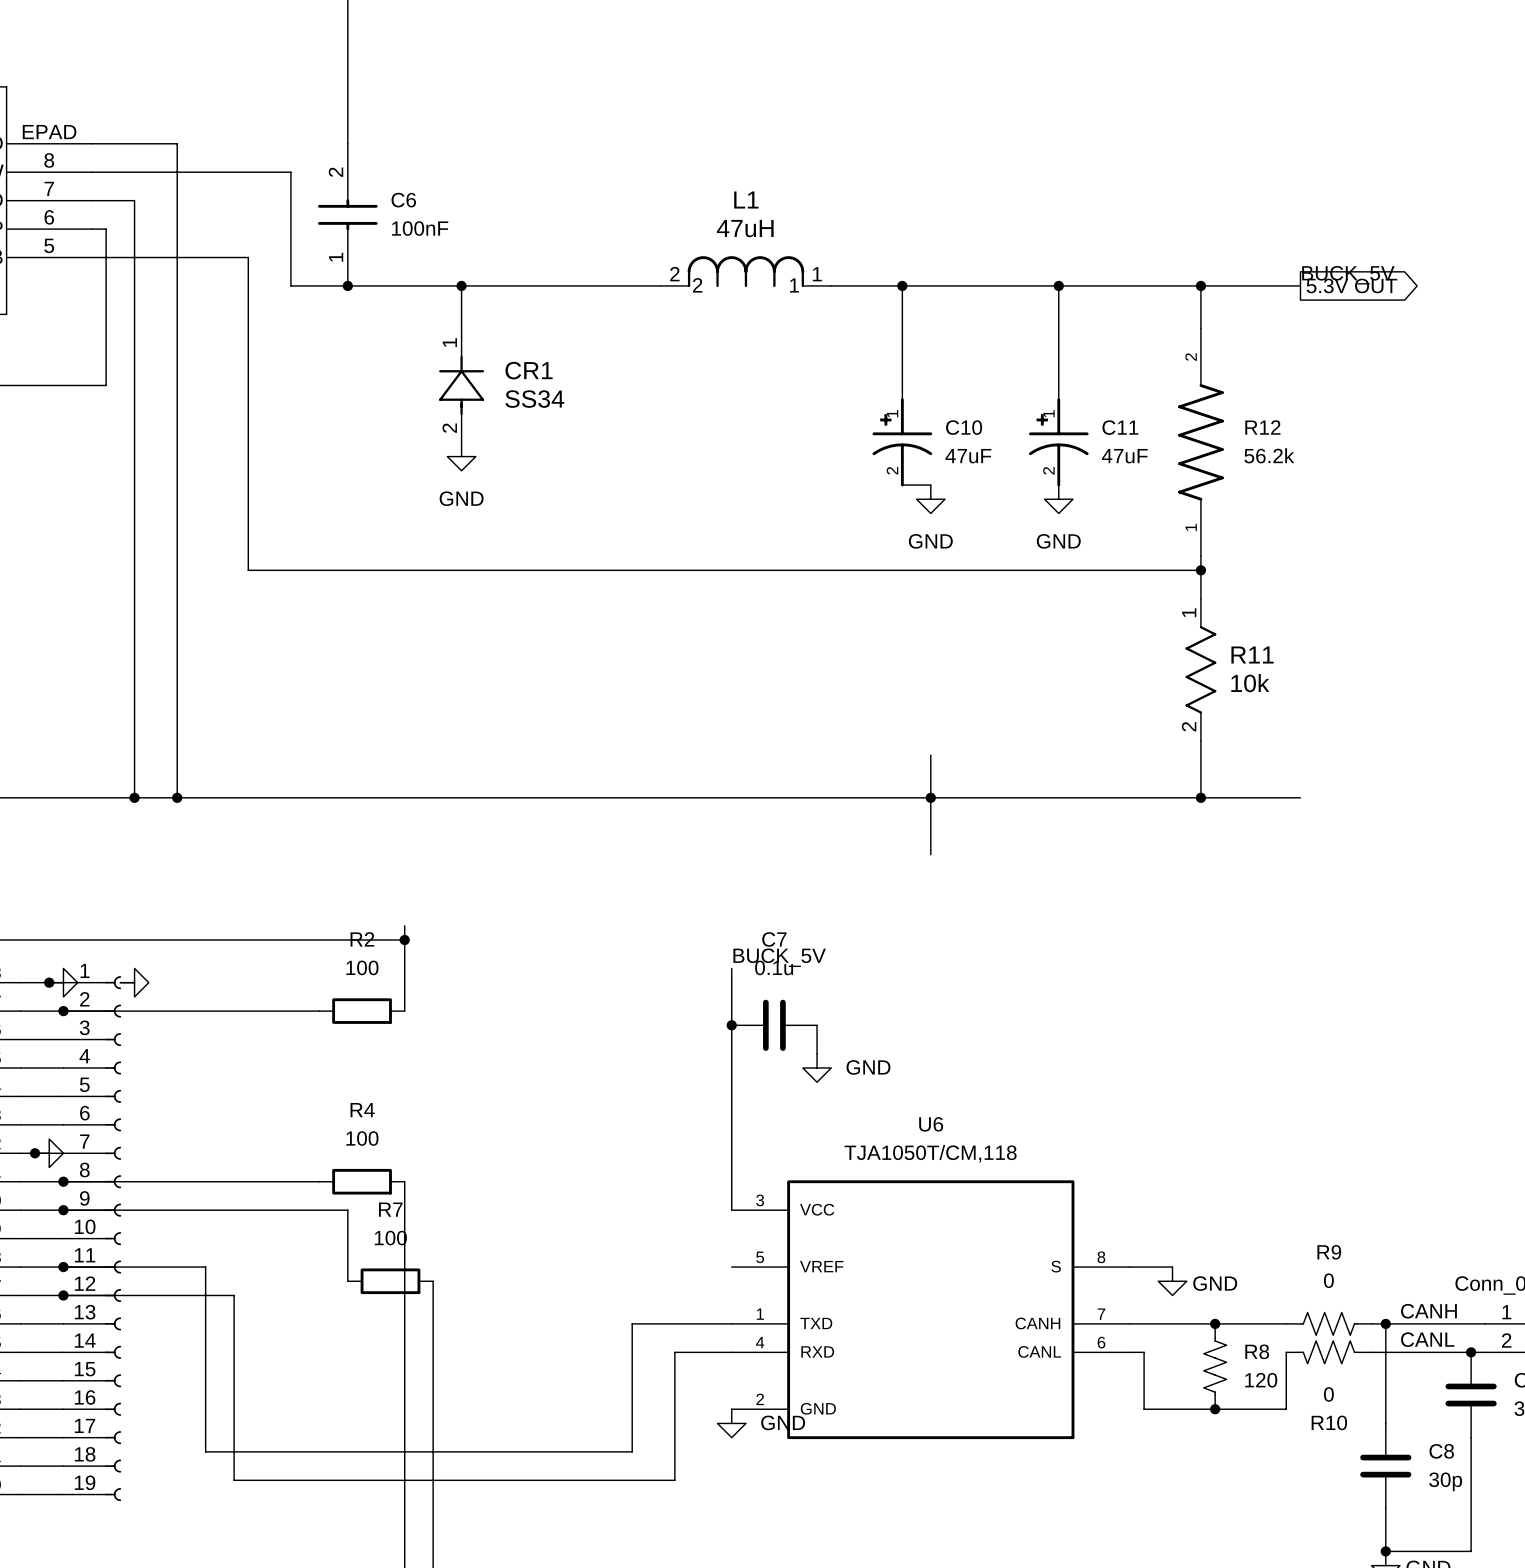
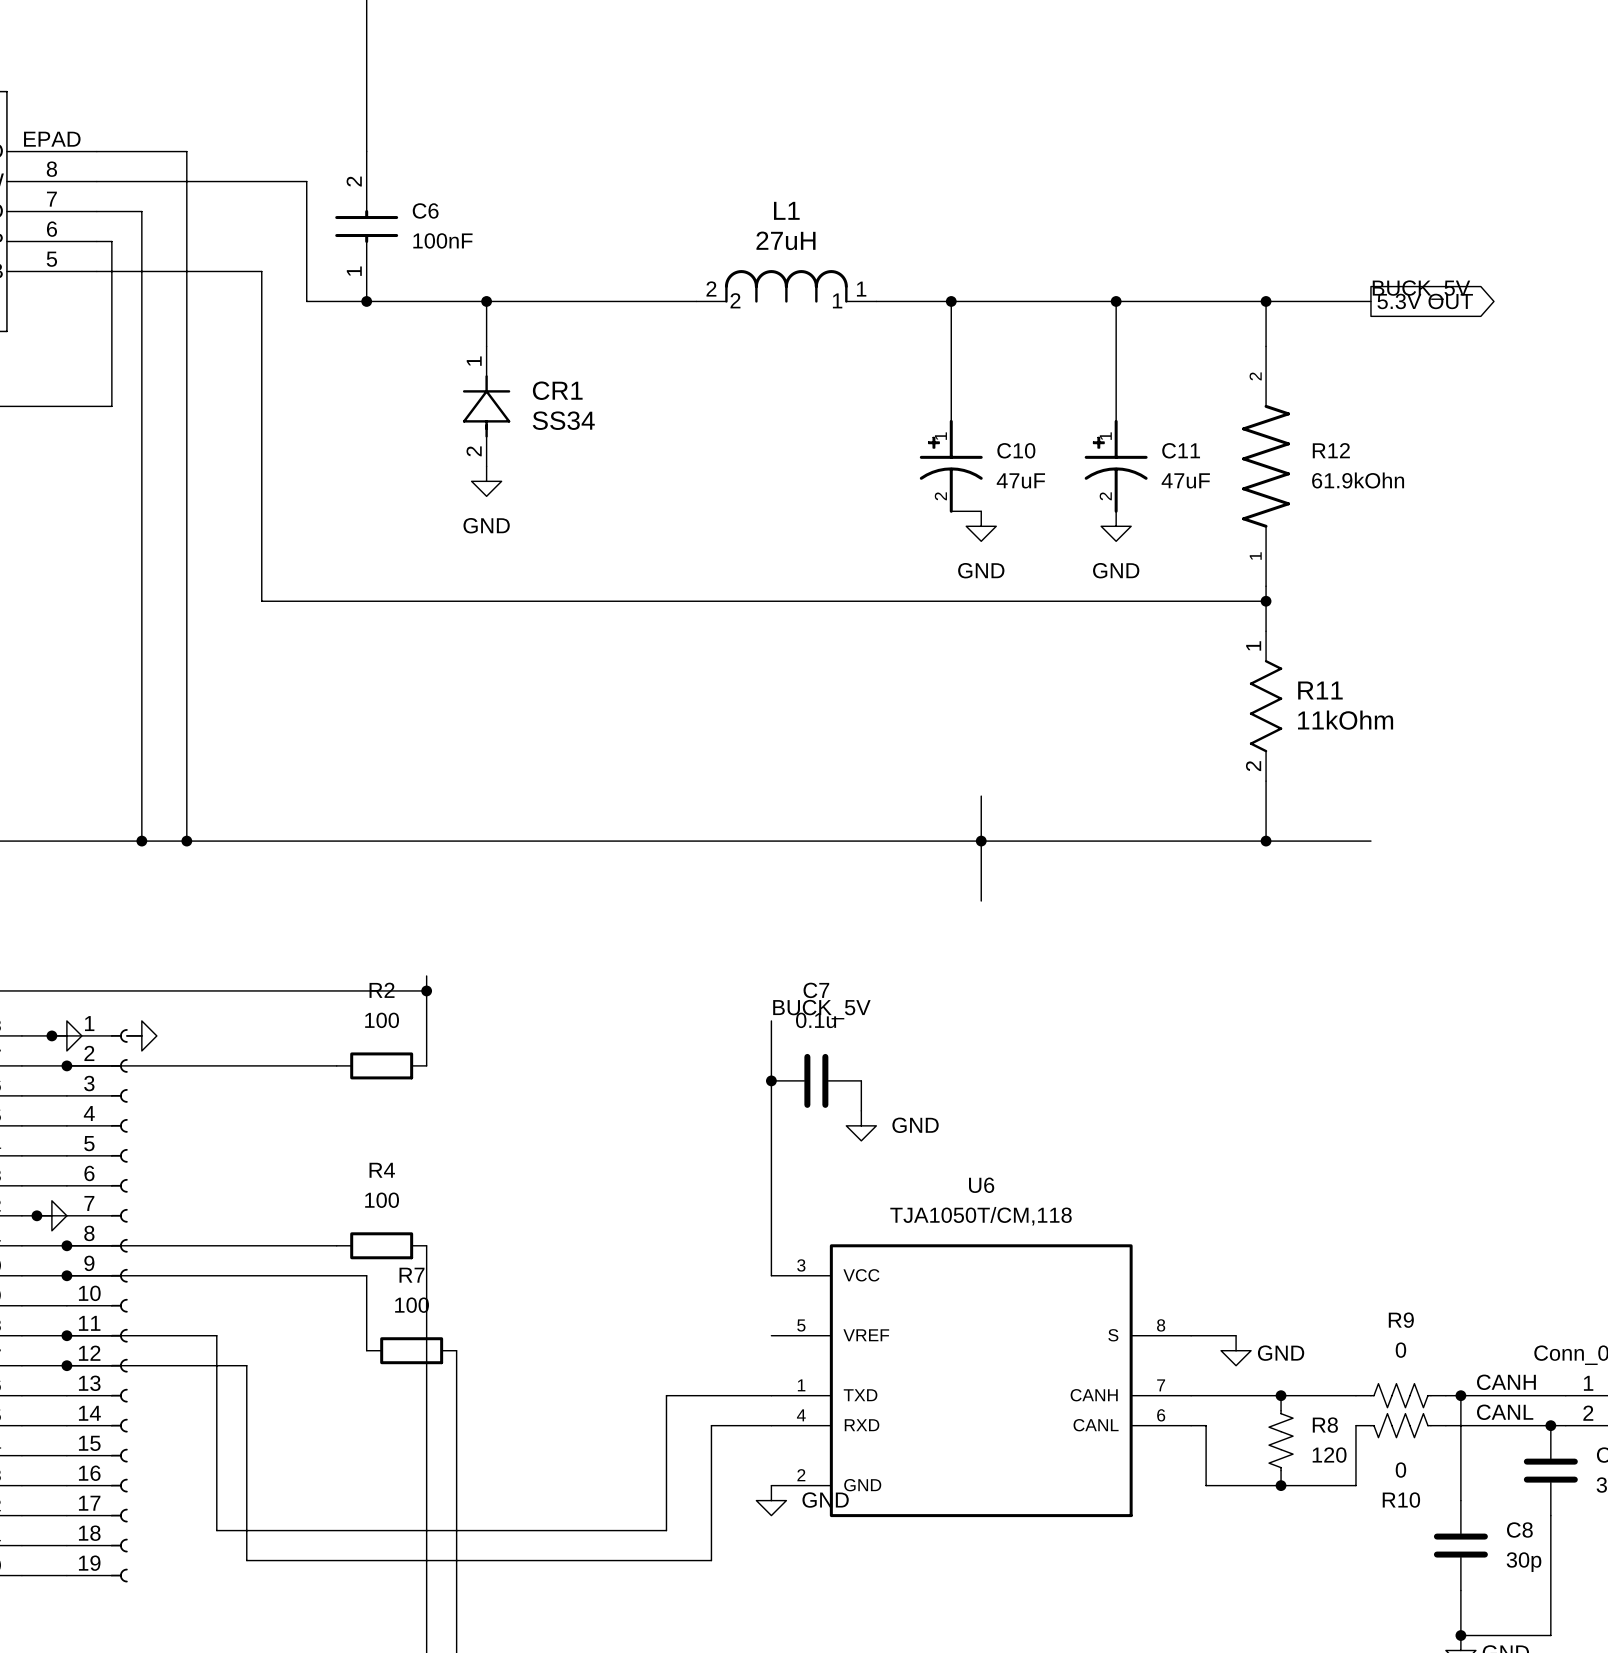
L1 value: 47uH (745, 228) -> 27uH (785, 240)
R12 value: 56.2k (1269, 455) -> 61.9kOhn (1358, 480)
R11 value: 10k (1250, 683) -> 11kOhm (1345, 720)

